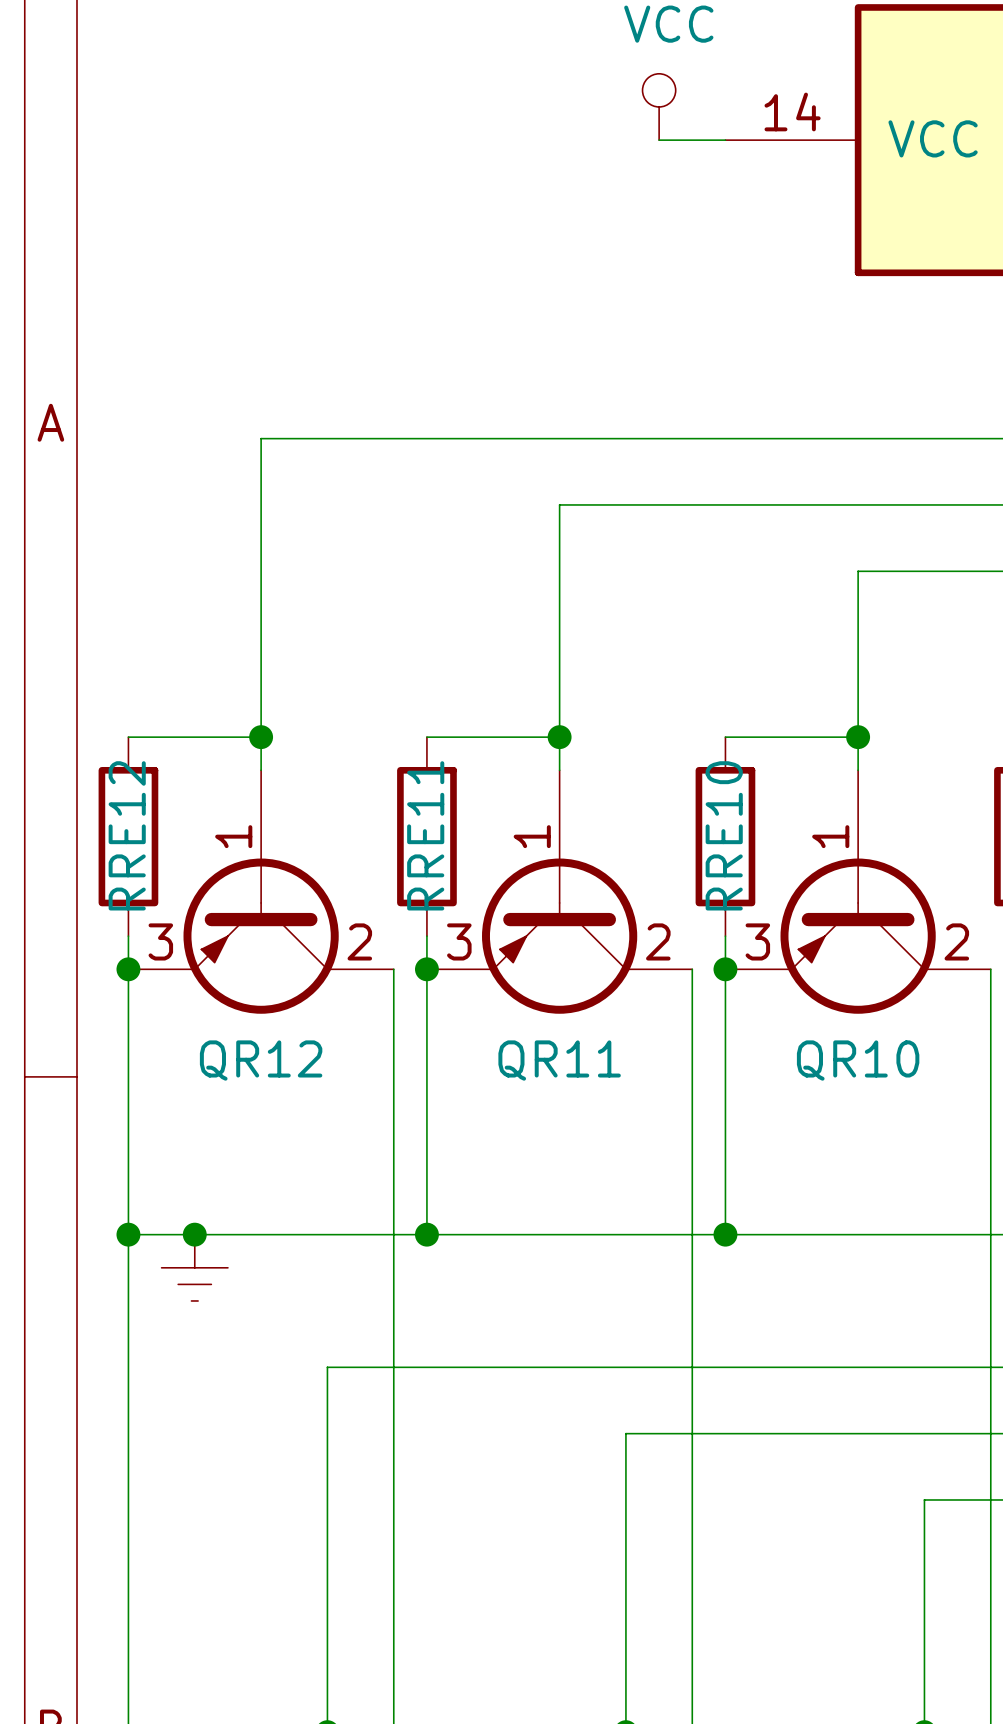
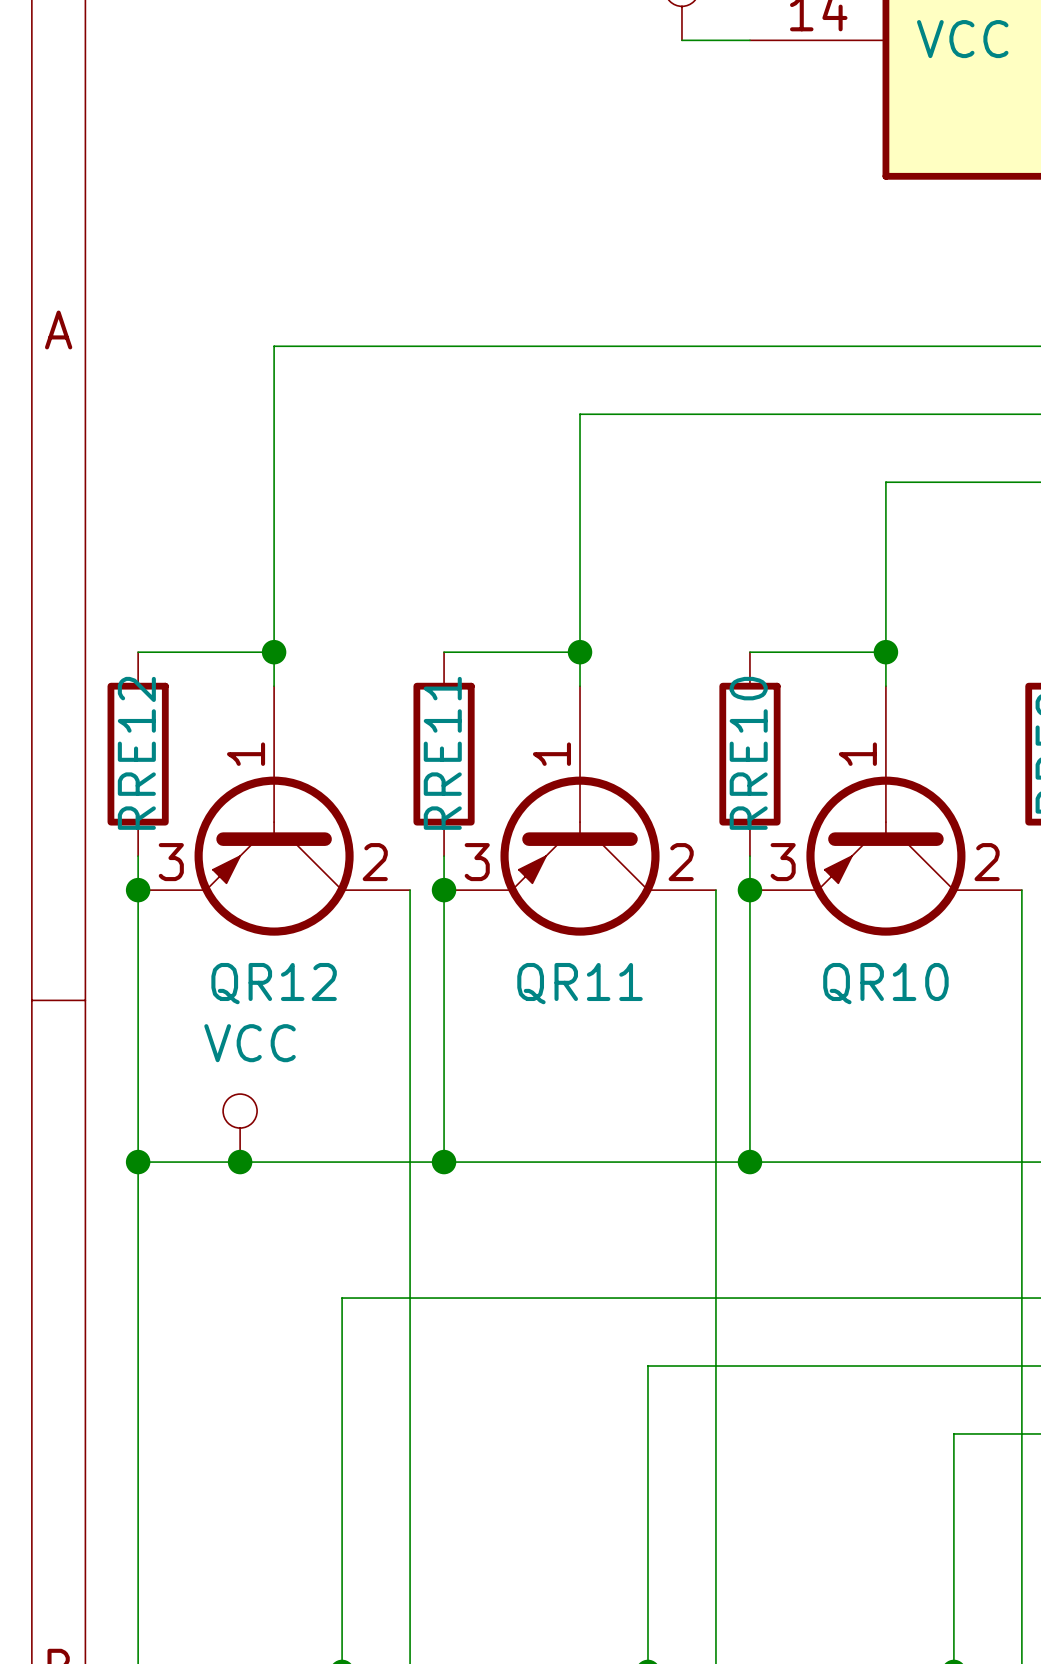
power symbol: none -> VCC (240, 1128)
junction position: (194, 1234) -> (240, 1162)
power symbol: (194, 1267) -> none

